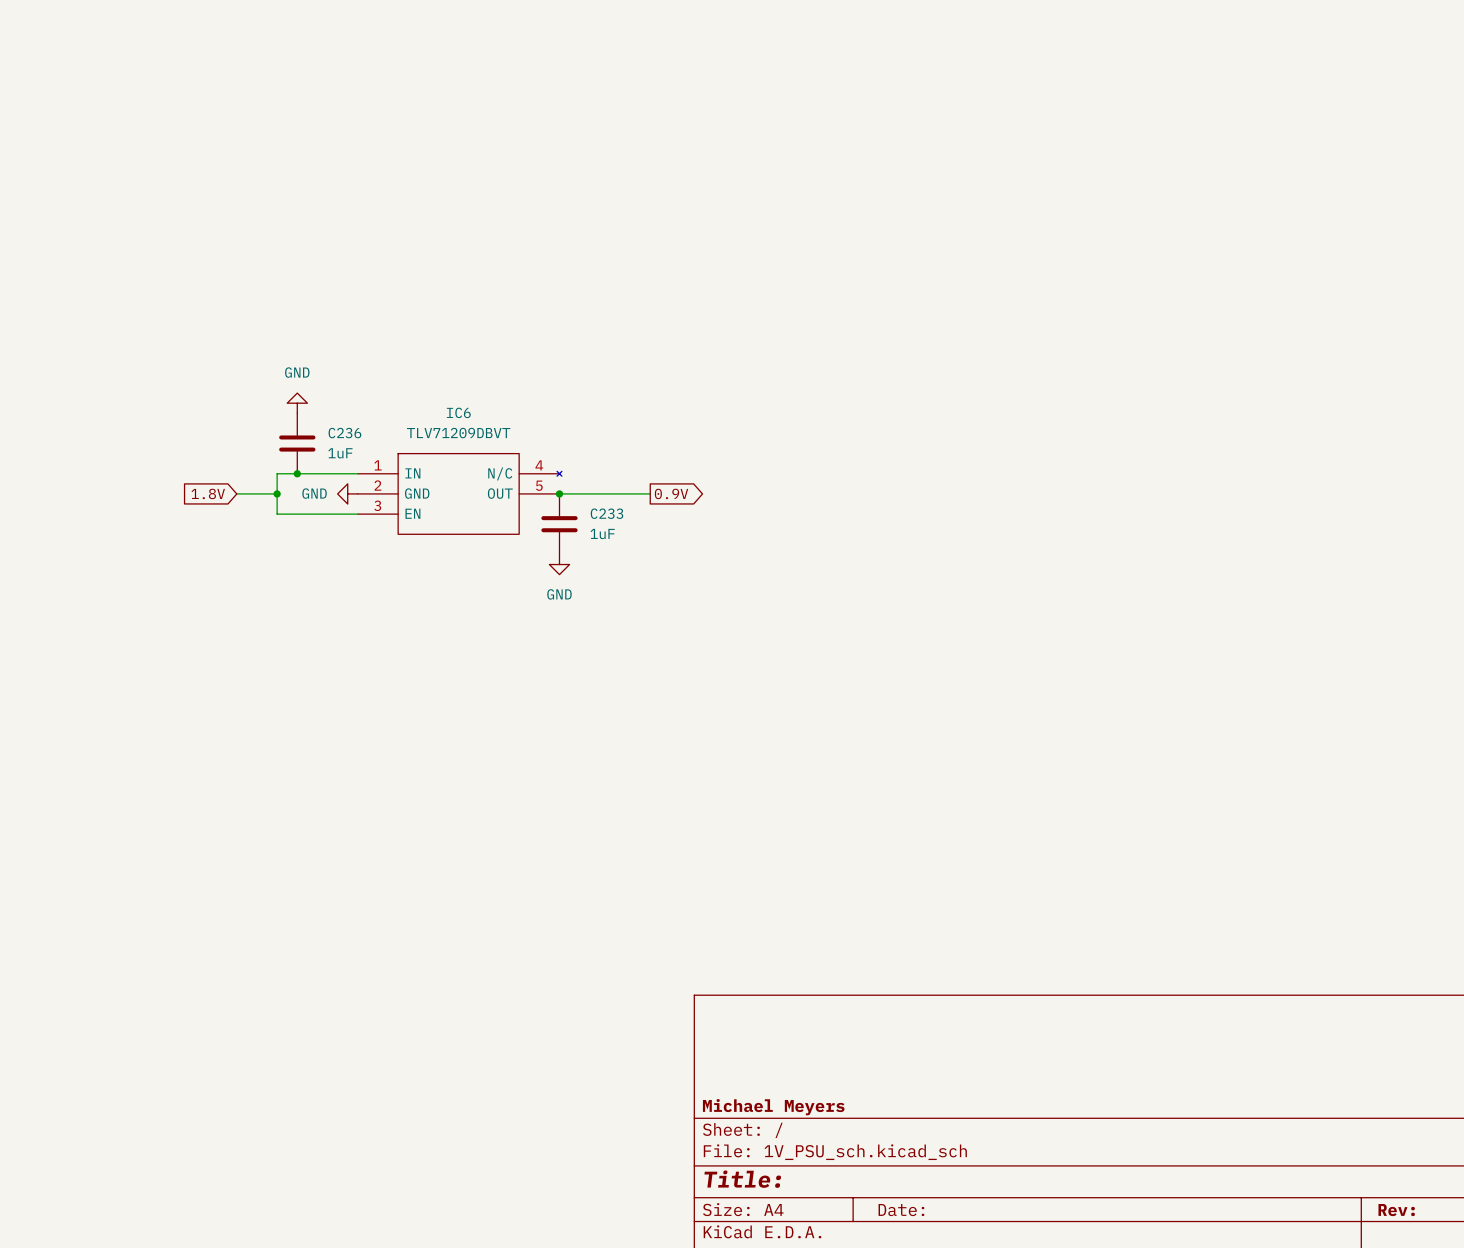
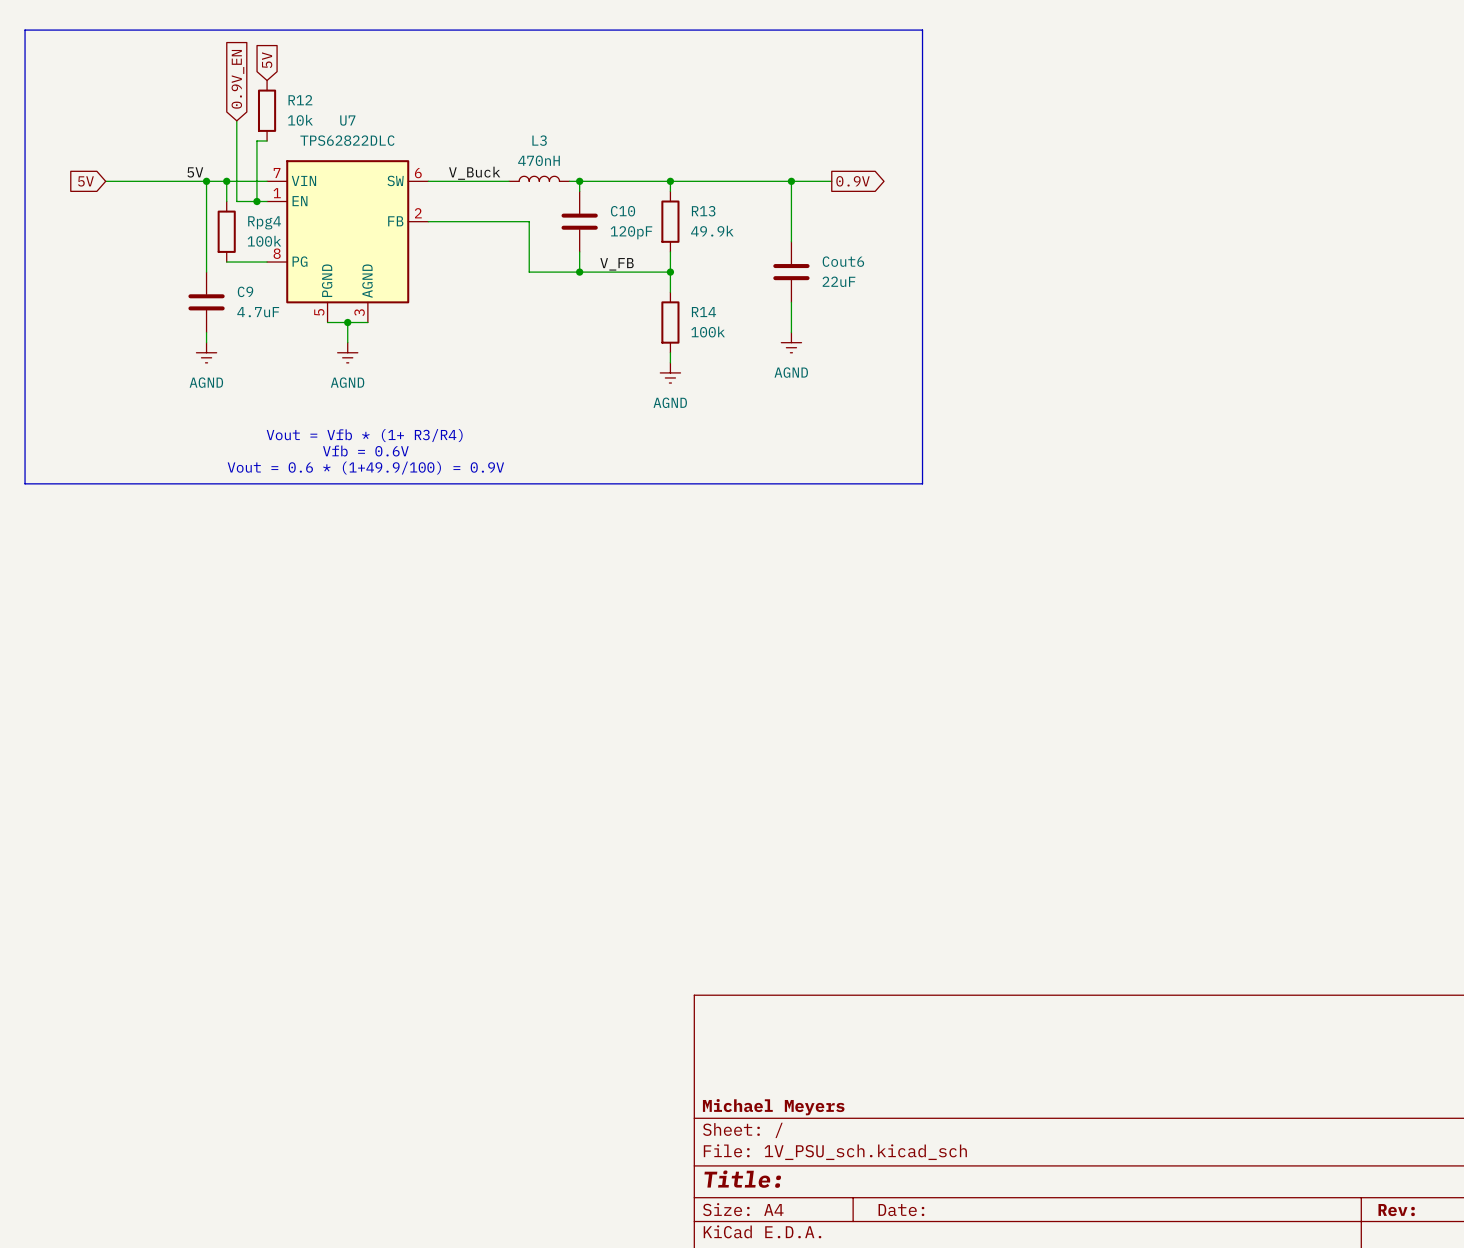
line: none -> (25, 30) (922, 30) (922, 483) (25, 483) (25, 30)
global label: none -> 5V (267, 60)
global label: none -> 0.9V_EN (237, 79)
R12: none -> 10k (267, 110)
wire: none -> (236, 120) (236, 201) (267, 201)
wire: none -> (267, 140) (256, 140) (256, 201)
label: none -> 5V (195, 172)
label: none -> V_Buck (474, 173)
L3: none -> 470nH (539, 178)
global label: none -> 5V (85, 181)
wire: none -> (105, 181) (267, 181)
wire: none -> (206, 181) (206, 272)
junction: none -> (206, 181)
wire: none -> (226, 181) (226, 201)
junction: none -> (226, 181)
wire: none -> (428, 181) (509, 181)
wire: none -> (569, 181) (831, 181)
wire: none -> (579, 181) (579, 191)
junction: none -> (579, 181)
wire: none -> (670, 181) (670, 191)
junction: none -> (670, 181)
wire: none -> (791, 181) (791, 241)
junction: none -> (791, 181)
global label: none -> 0.9V (853, 181)
junction: none -> (256, 201)
wire: none -> (428, 221) (529, 221) (529, 272) (670, 272)
C10: none -> 120pF (579, 221)
R13: none -> 49.9k (670, 221)
Rpg4: none -> 100k (226, 231)
U7: none -> TPS62822DLC (347, 241)
wire: none -> (579, 251) (579, 272)
wire: none -> (670, 251) (670, 292)
wire: none -> (226, 262) (267, 262)
label: none -> V_FB (617, 264)
junction: none -> (579, 272)
junction: none -> (670, 272)
Cout6: none -> 22uF (791, 272)
C9: none -> 4.7uF (206, 302)
wire: none -> (791, 302) (791, 332)
wire: none -> (347, 322) (347, 342)
junction: none -> (347, 322)
R14: none -> 100k (670, 322)
wire: none -> (206, 332) (206, 342)
power symbol: none -> AGND (791, 342)
power symbol: none -> AGND (206, 352)
power symbol: none -> AGND (347, 352)
wire: none -> (670, 352) (670, 362)
power symbol: none -> AGND (670, 372)
power symbol: GND (297, 403) -> none
text: none -> Vout = Vfb * (1+ R3/R4) (364, 435)
C236: 1uF (297, 443) -> none
text: none -> Vfb = 0.6V (365, 451)
text: none -> Vout = 0.6 * (1+49.9/100) = 0.9V (365, 468)
junction: (297, 473) -> none
wire: (357, 473) (277, 473) (277, 514) (357, 514) -> none
global label: 1.8V (208, 493) -> none
wire: (236, 493) (277, 493) -> (327, 322) (367, 322)
junction: (277, 493) -> none
power symbol: GND (347, 493) -> none
IC6: TLV71209DBVT (459, 493) -> none
wire: (559, 493) (650, 493) -> none
junction: (559, 493) -> none
global label: 0.9V (671, 493) -> none
C233: 1uF (559, 524) -> none
power symbol: GND (559, 564) -> none

